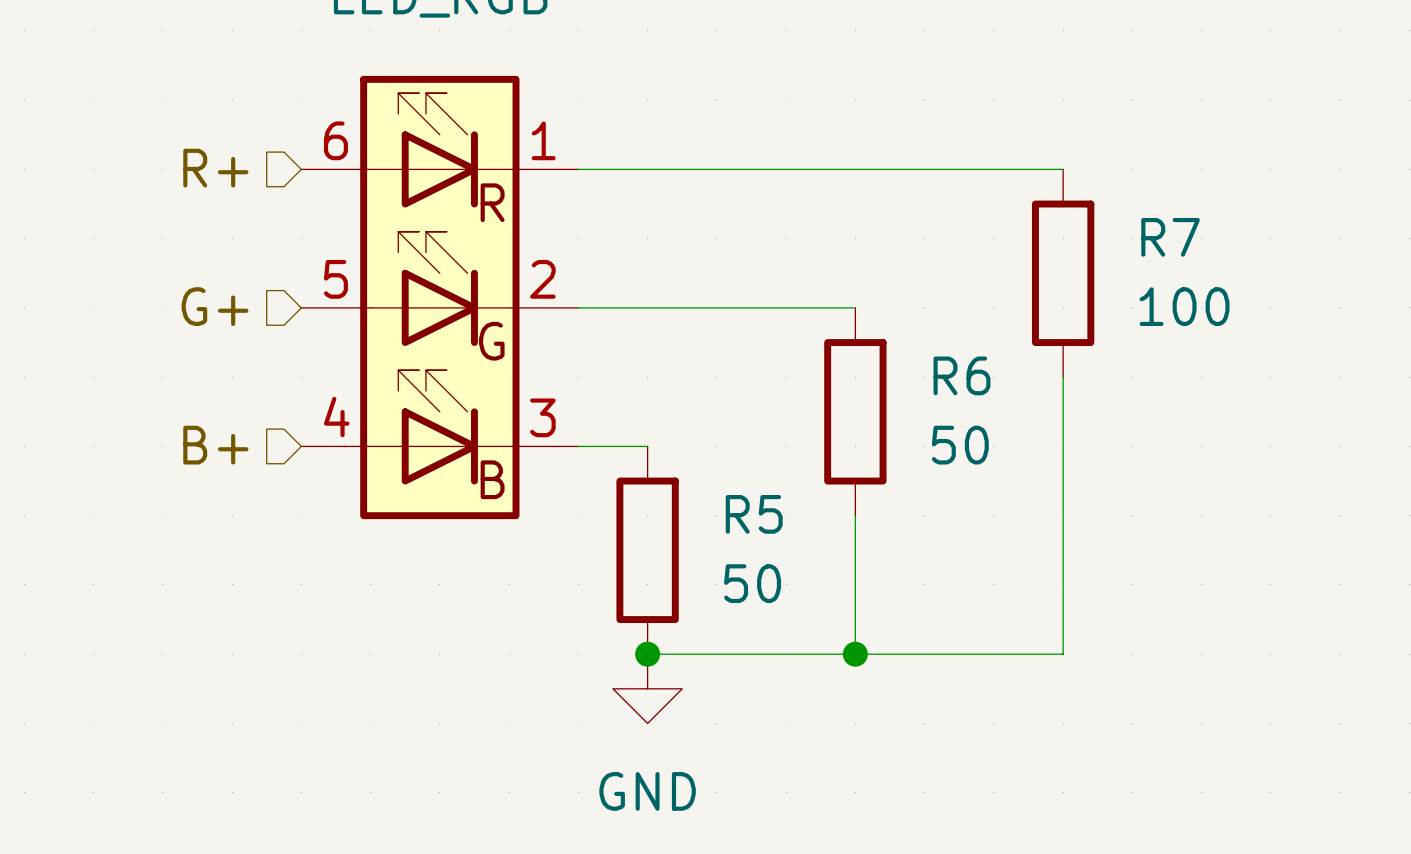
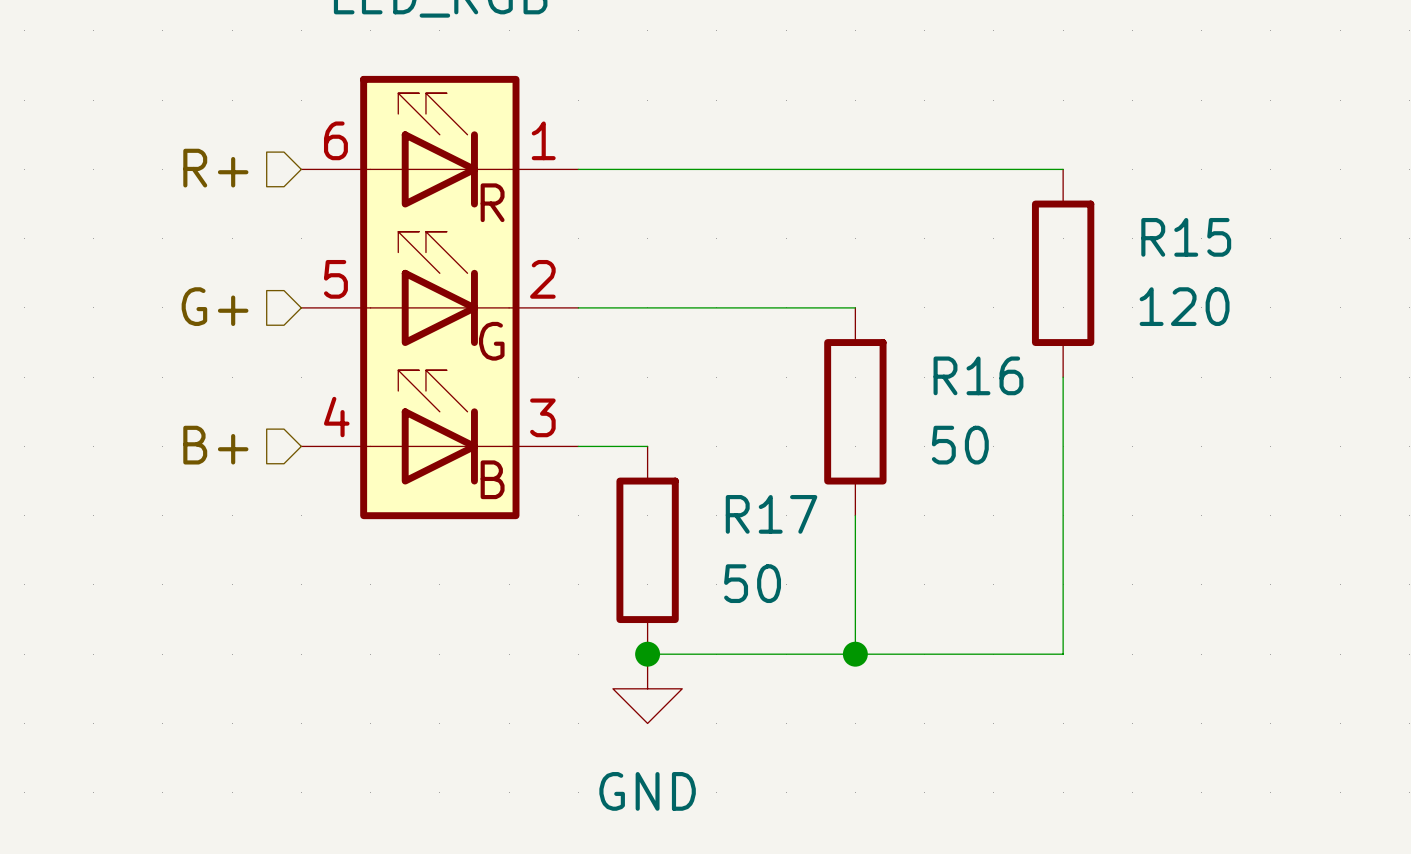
R7 name: R7 (1170, 237) -> R15 (1186, 237)
R7 value: 100 (1184, 306) -> 120 (1184, 306)
R6 name: R6 (961, 375) -> R16 (978, 375)
R5 name: R5 (754, 514) -> R17 (771, 514)

